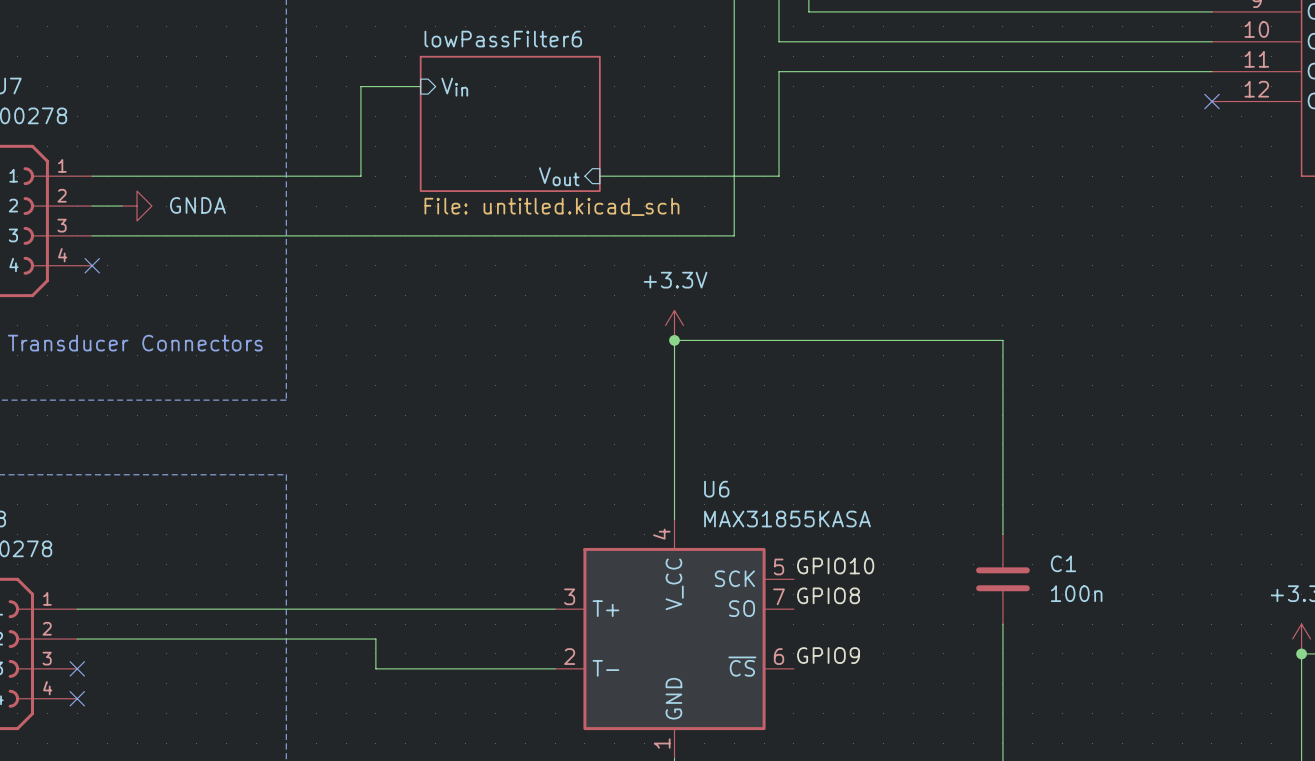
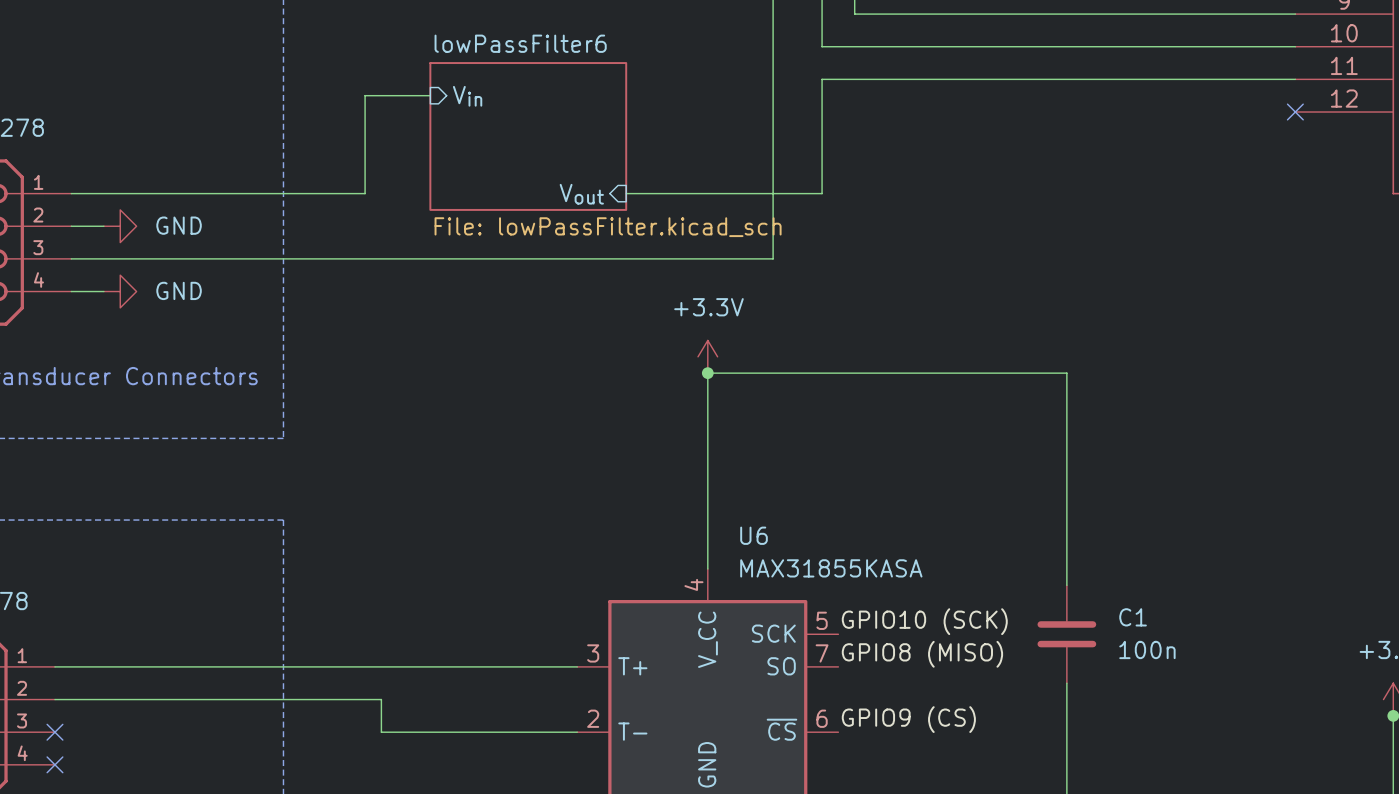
power symbol: GNDA (137, 206) -> GND (120, 226)
sheet lowPassFilter6 value: File: untitled.kicad_sch (551, 206) -> File: lowPassFilter.kicad_sch (608, 227)
wire: none -> (71, 291) (103, 291)
no-connect mark: (92, 265) -> none
power symbol: none -> GND (120, 291)
label: GPIO10 (835, 565) -> GPIO10 (SCK) (924, 621)
label: GPIO8 (828, 595) -> GPIO8 (MISO) (922, 654)
label: GPIO9 (828, 655) -> GPIO9 (CS) (908, 719)

